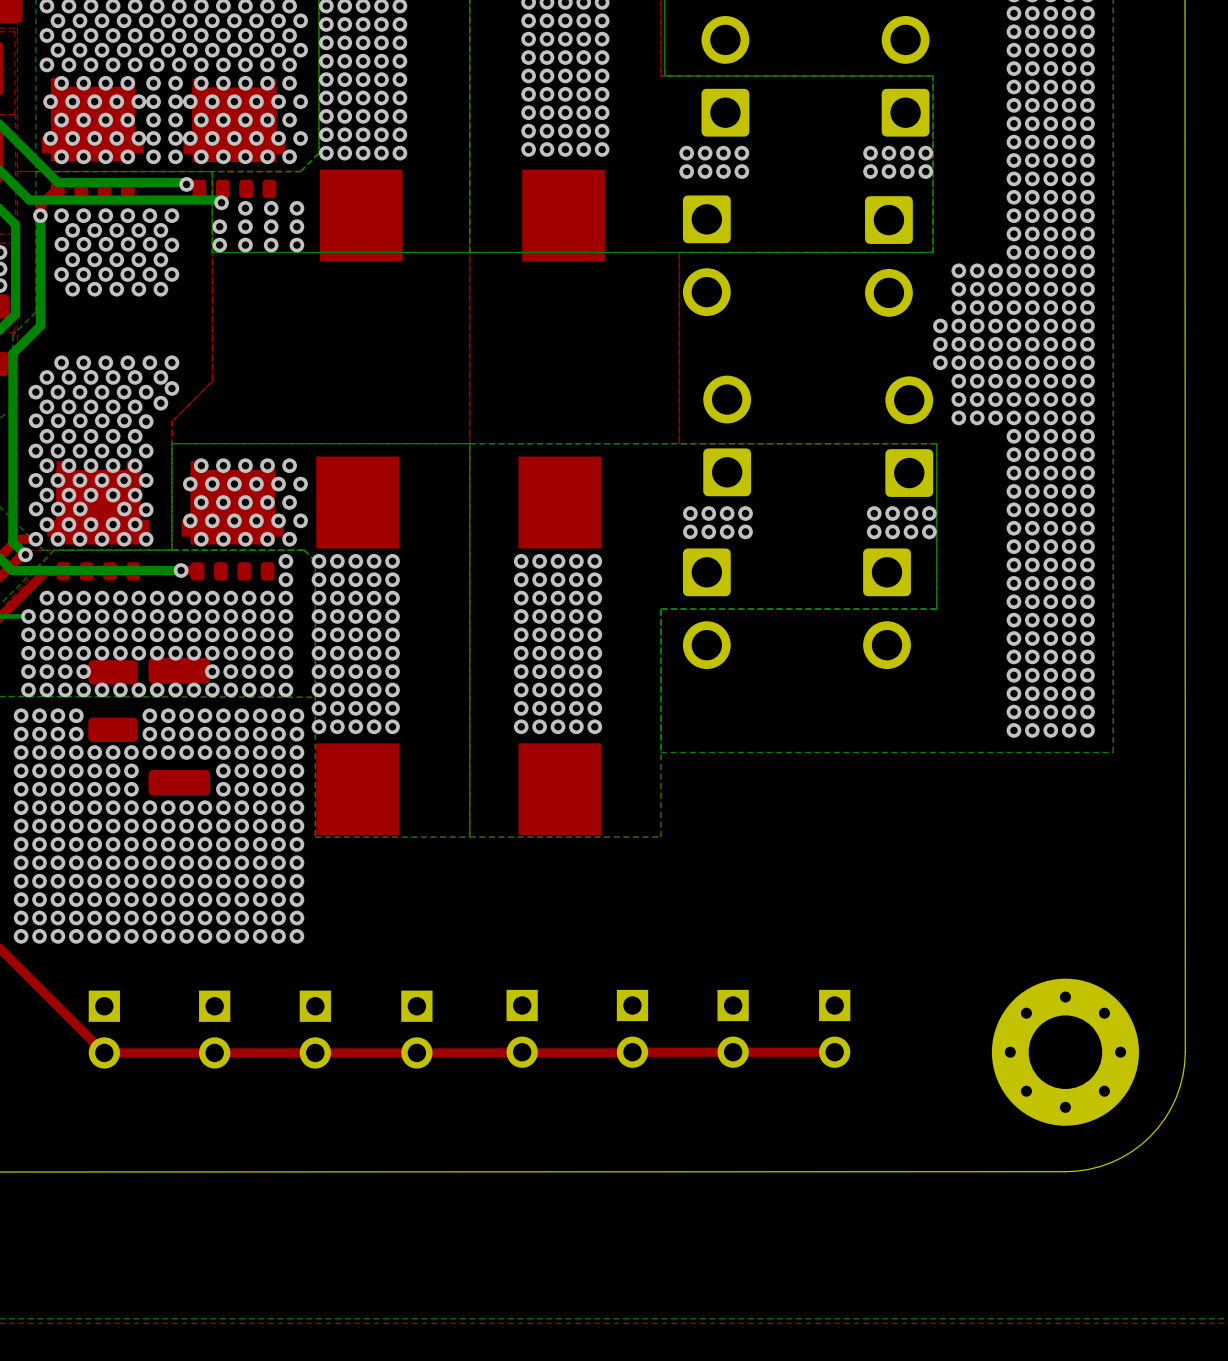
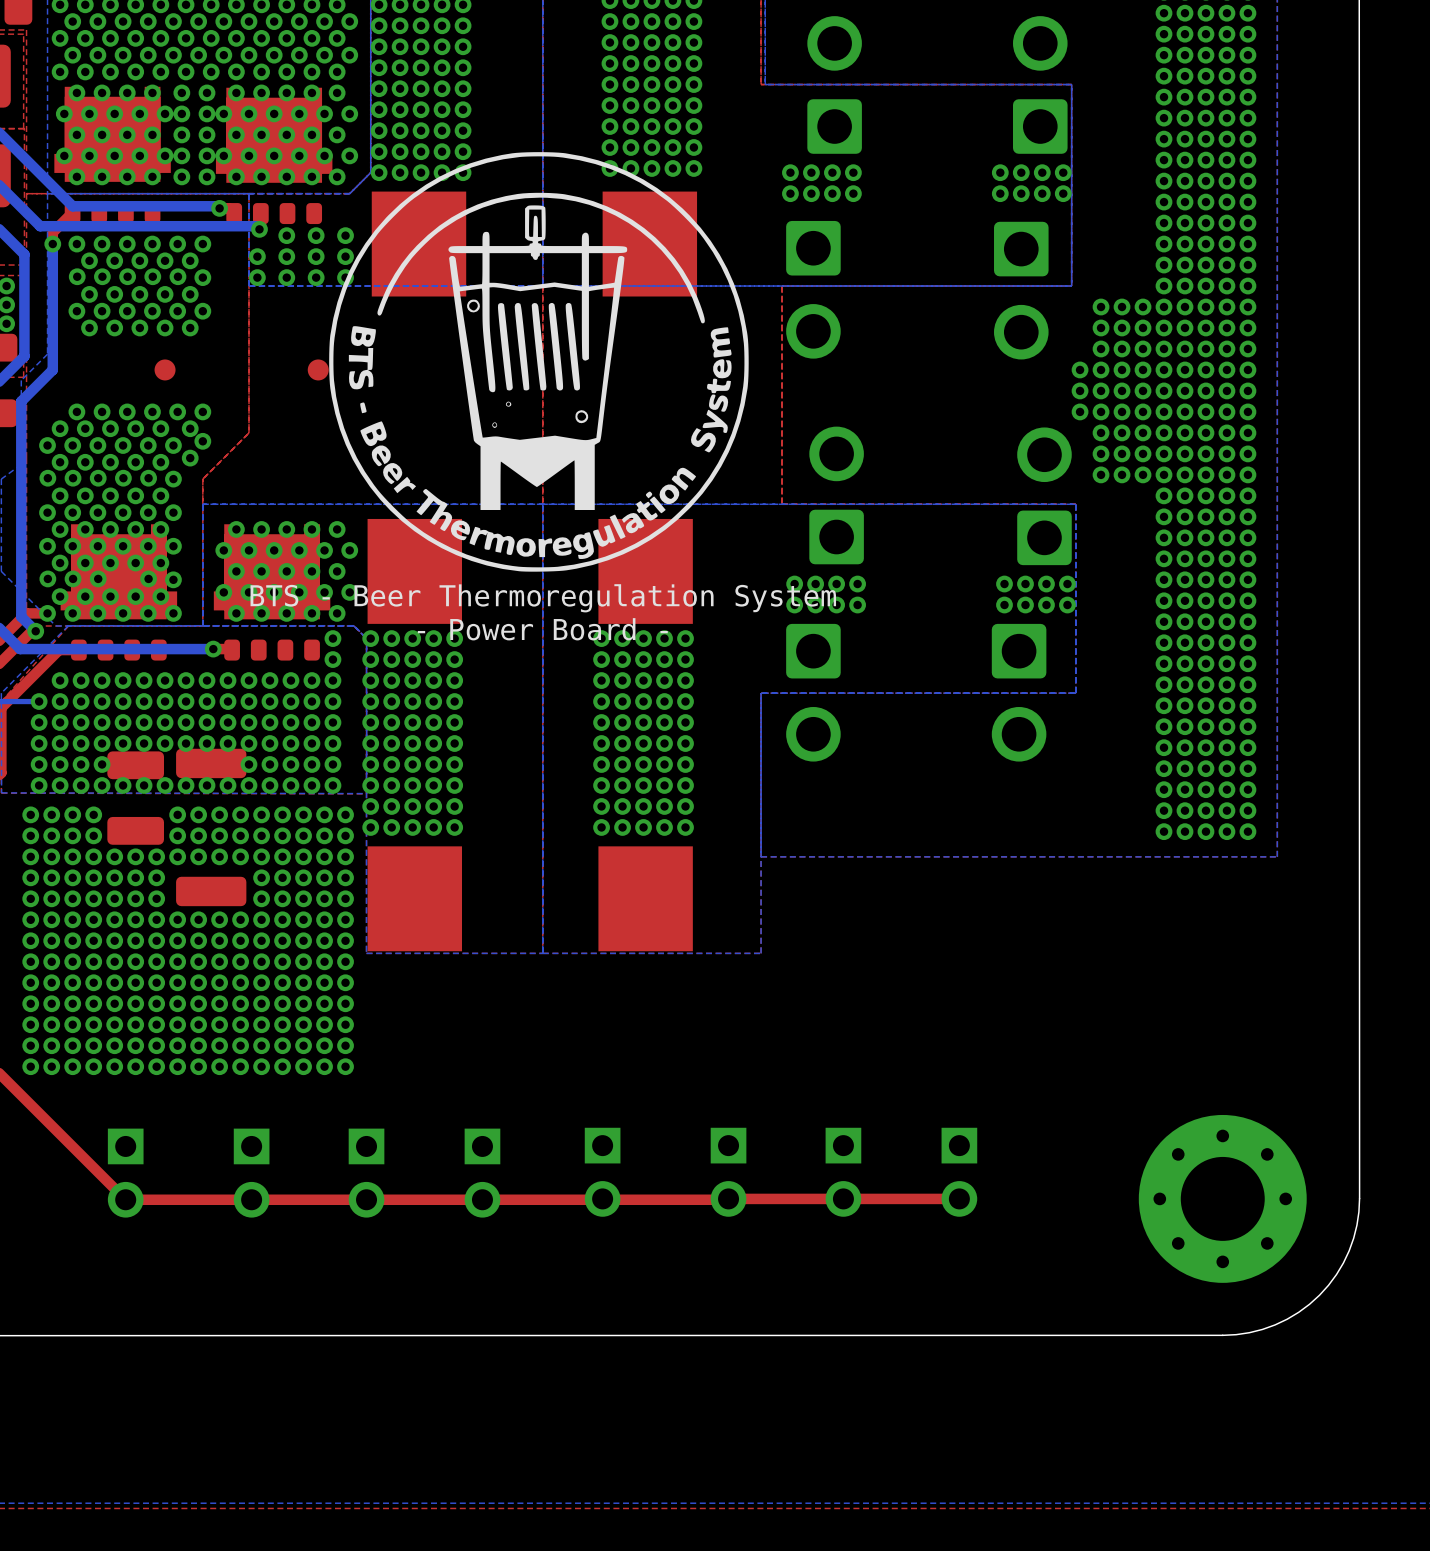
drawing: none -> [329, 152, 749, 572]
part: none -> (165, 369)
part: none -> (318, 369)
text: none -> BTS - Beer Thermoregulation System (543, 598)
text: none -> - Power Board - (542, 629)

